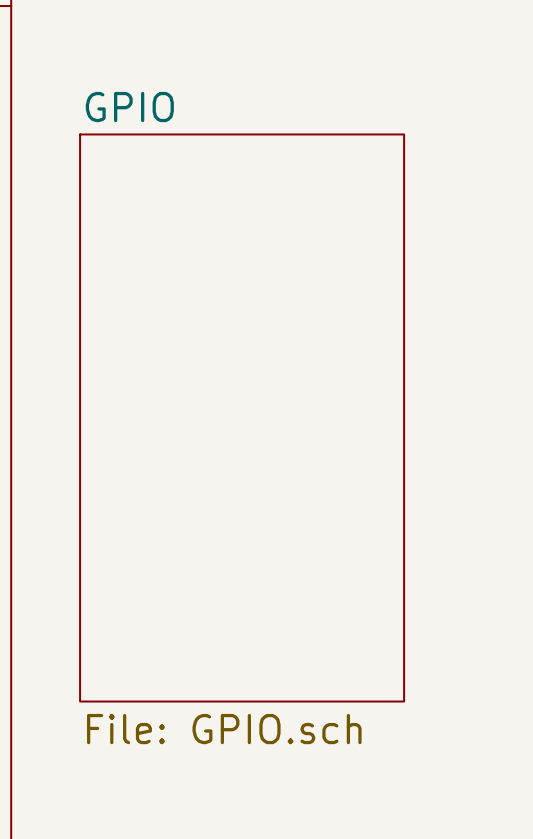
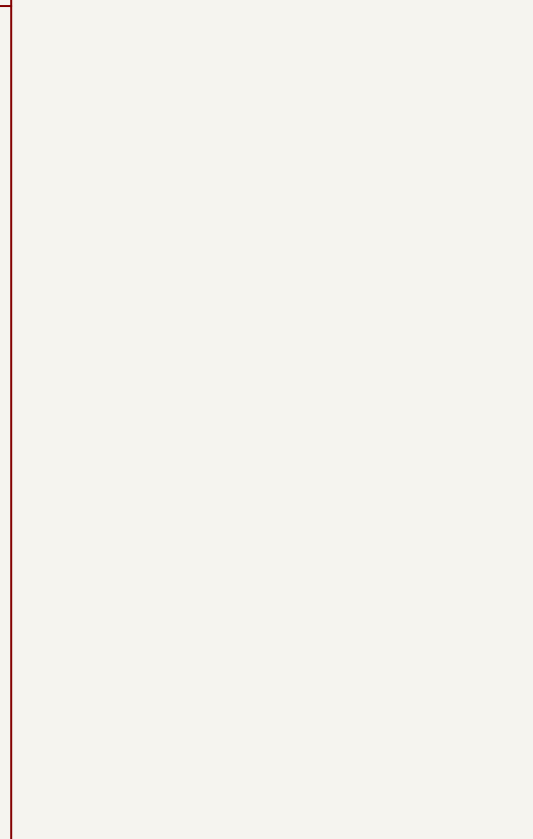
sheet GPIO: File: GPIO.sch (242, 417) -> none

